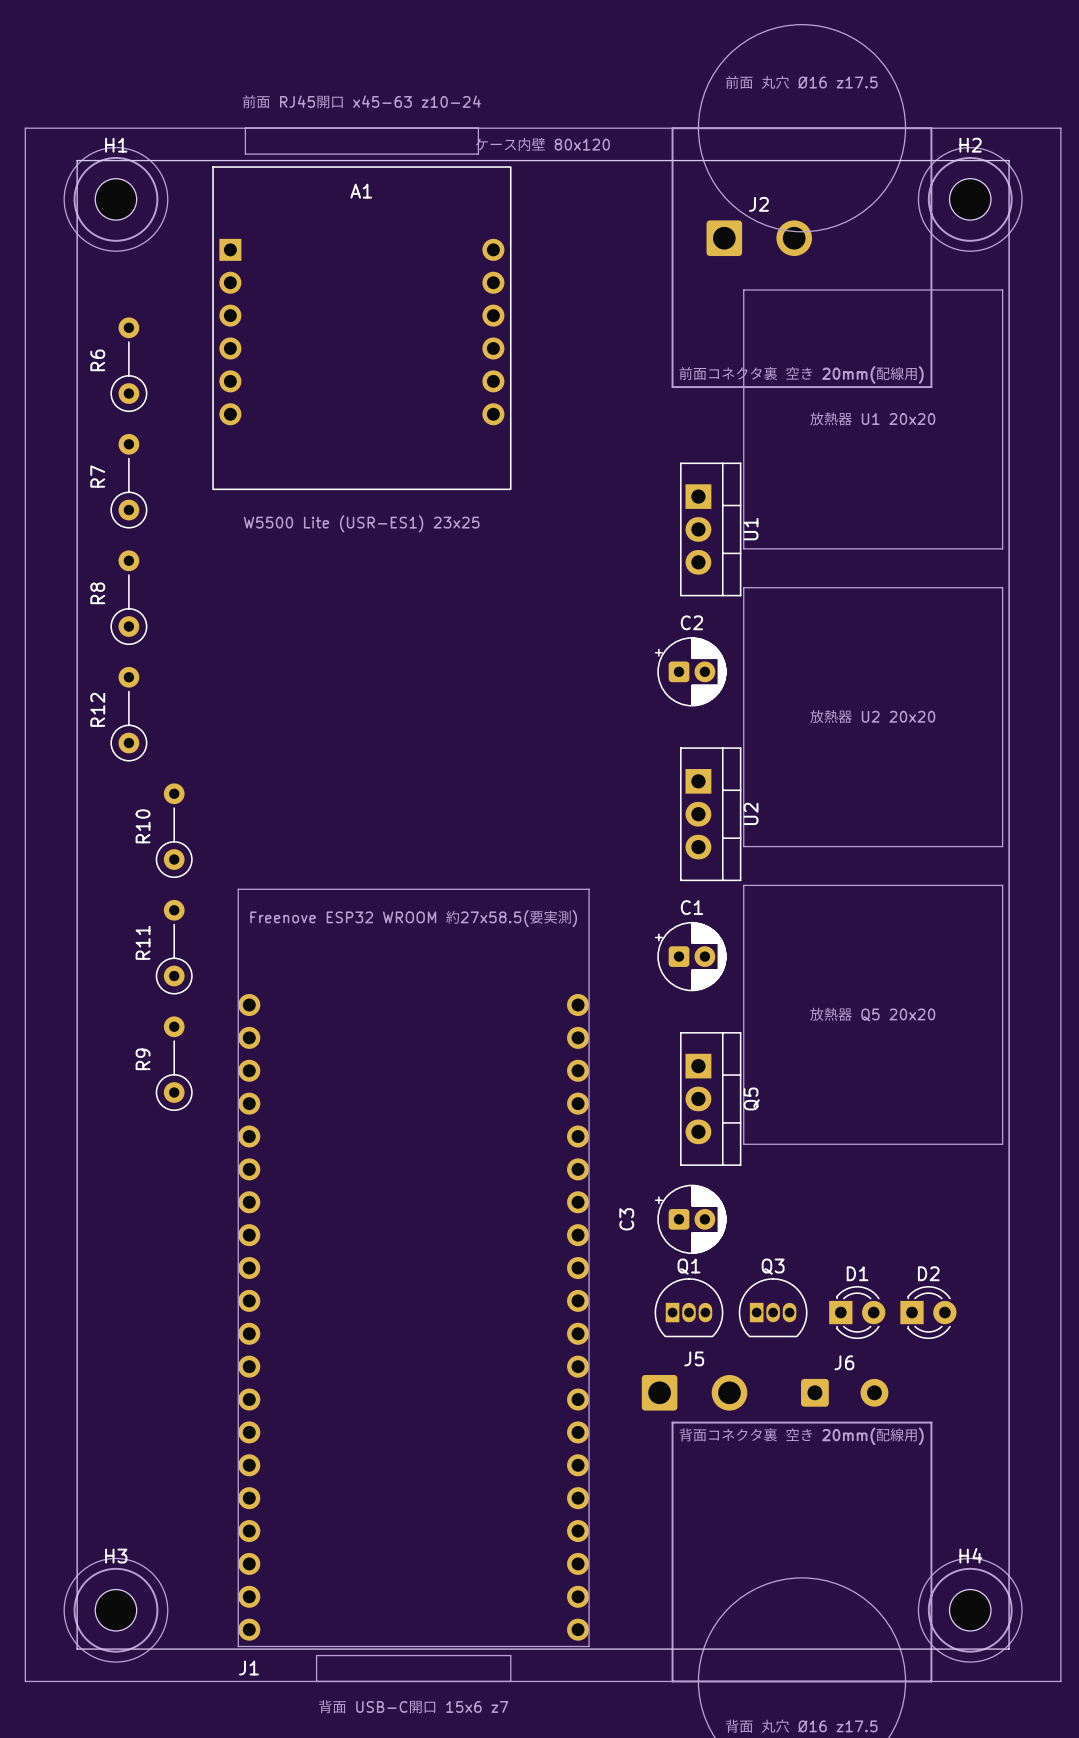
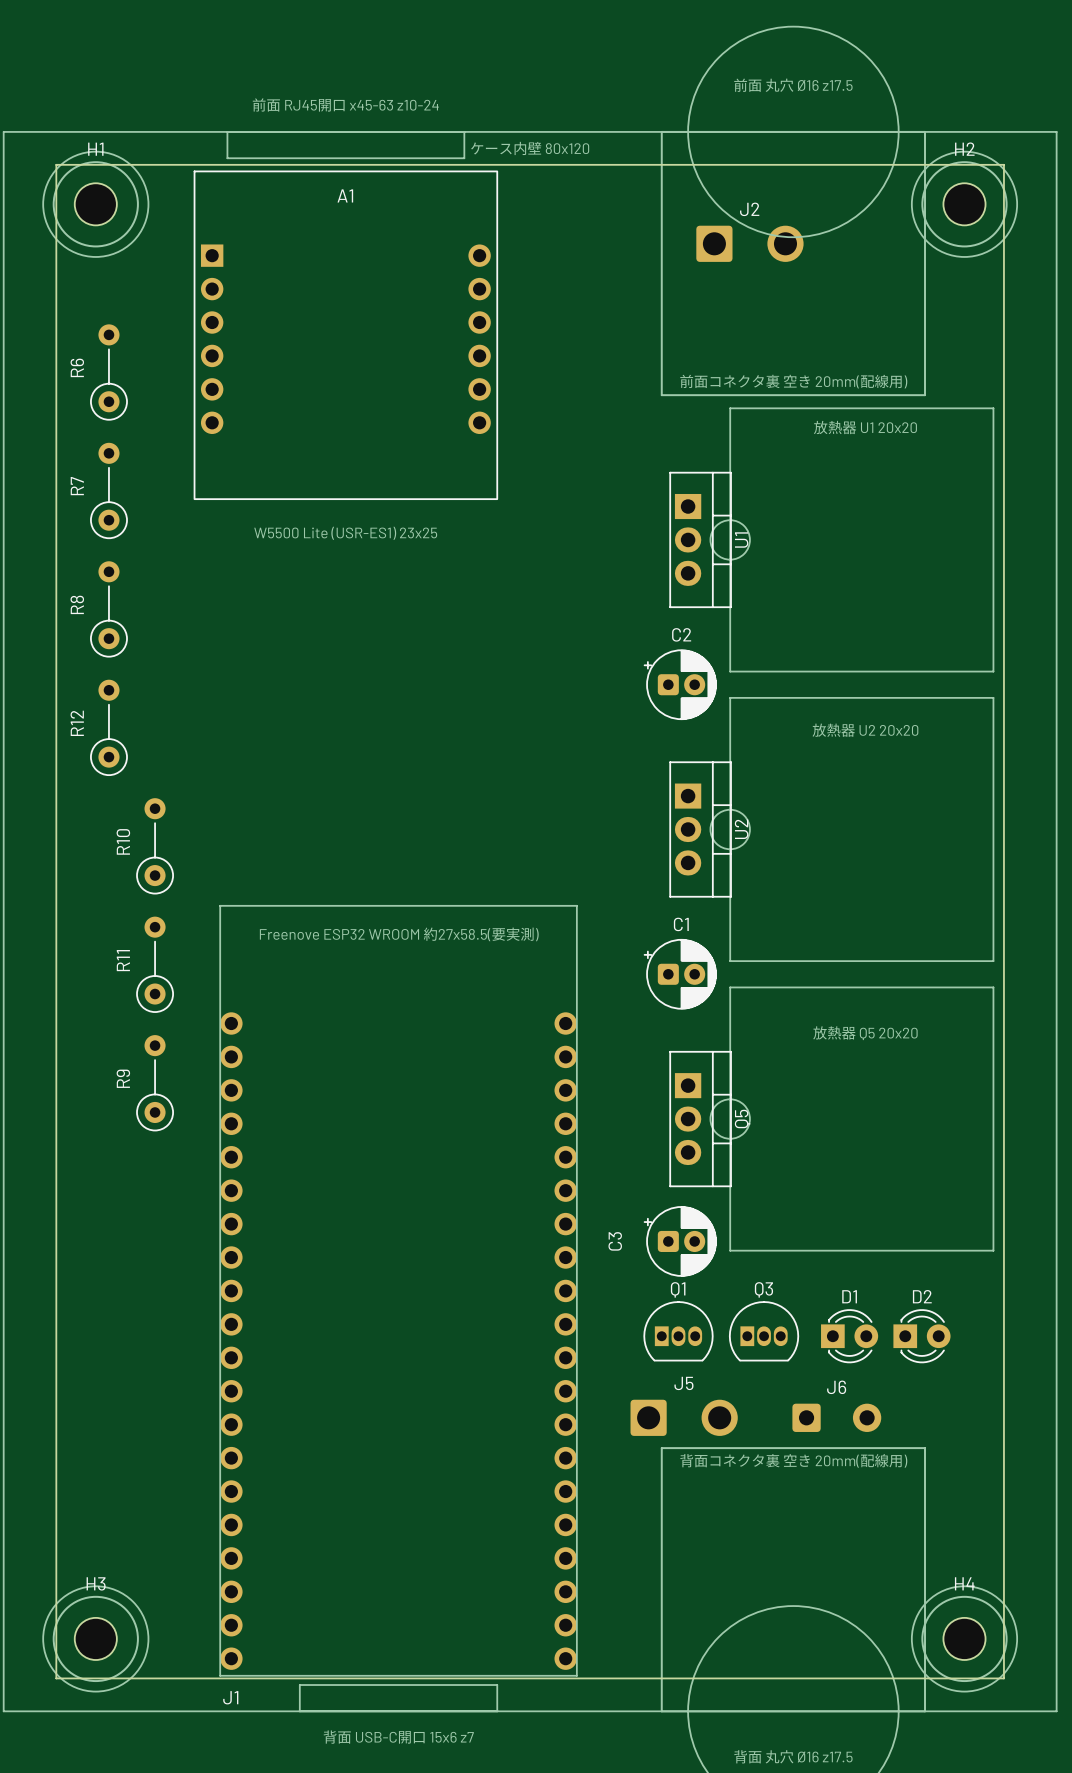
line: (743, 289) (1002, 289) (1002, 548) (743, 548) (743, 289) -> (730, 408) (993, 408) (993, 671) (730, 671) (730, 408)
drawing: none -> [709, 519, 751, 561]
line: (743, 587) (743, 846) (1002, 846) (1002, 587) (743, 587) -> (730, 697) (730, 961) (993, 961) (993, 697) (730, 697)
drawing: none -> [709, 809, 751, 850]
line: (743, 885) (743, 1144) (1002, 1144) (1002, 885) (743, 885) -> (730, 987) (730, 1250) (993, 1250) (993, 987) (730, 987)
drawing: none -> [709, 1098, 751, 1140]

